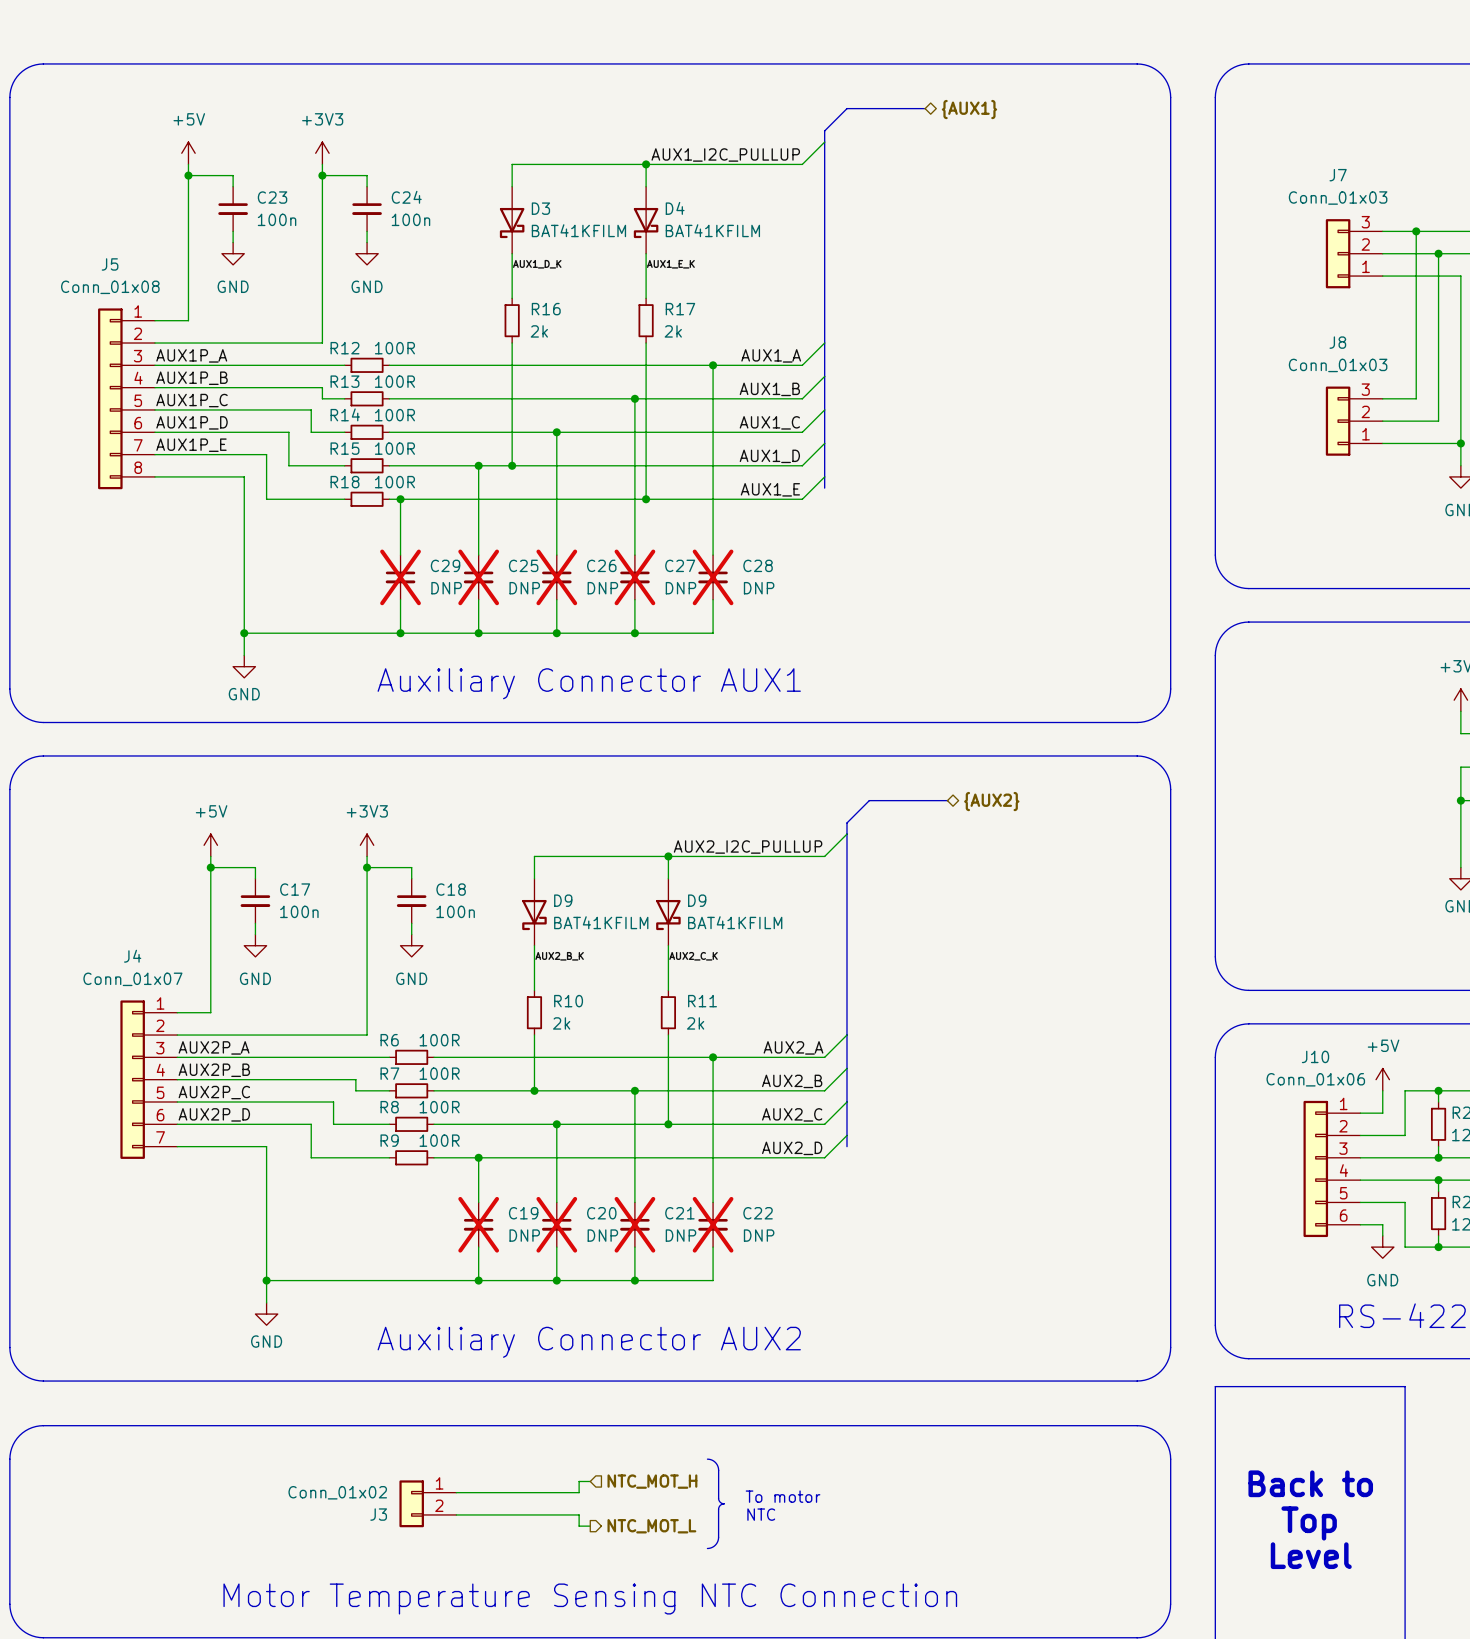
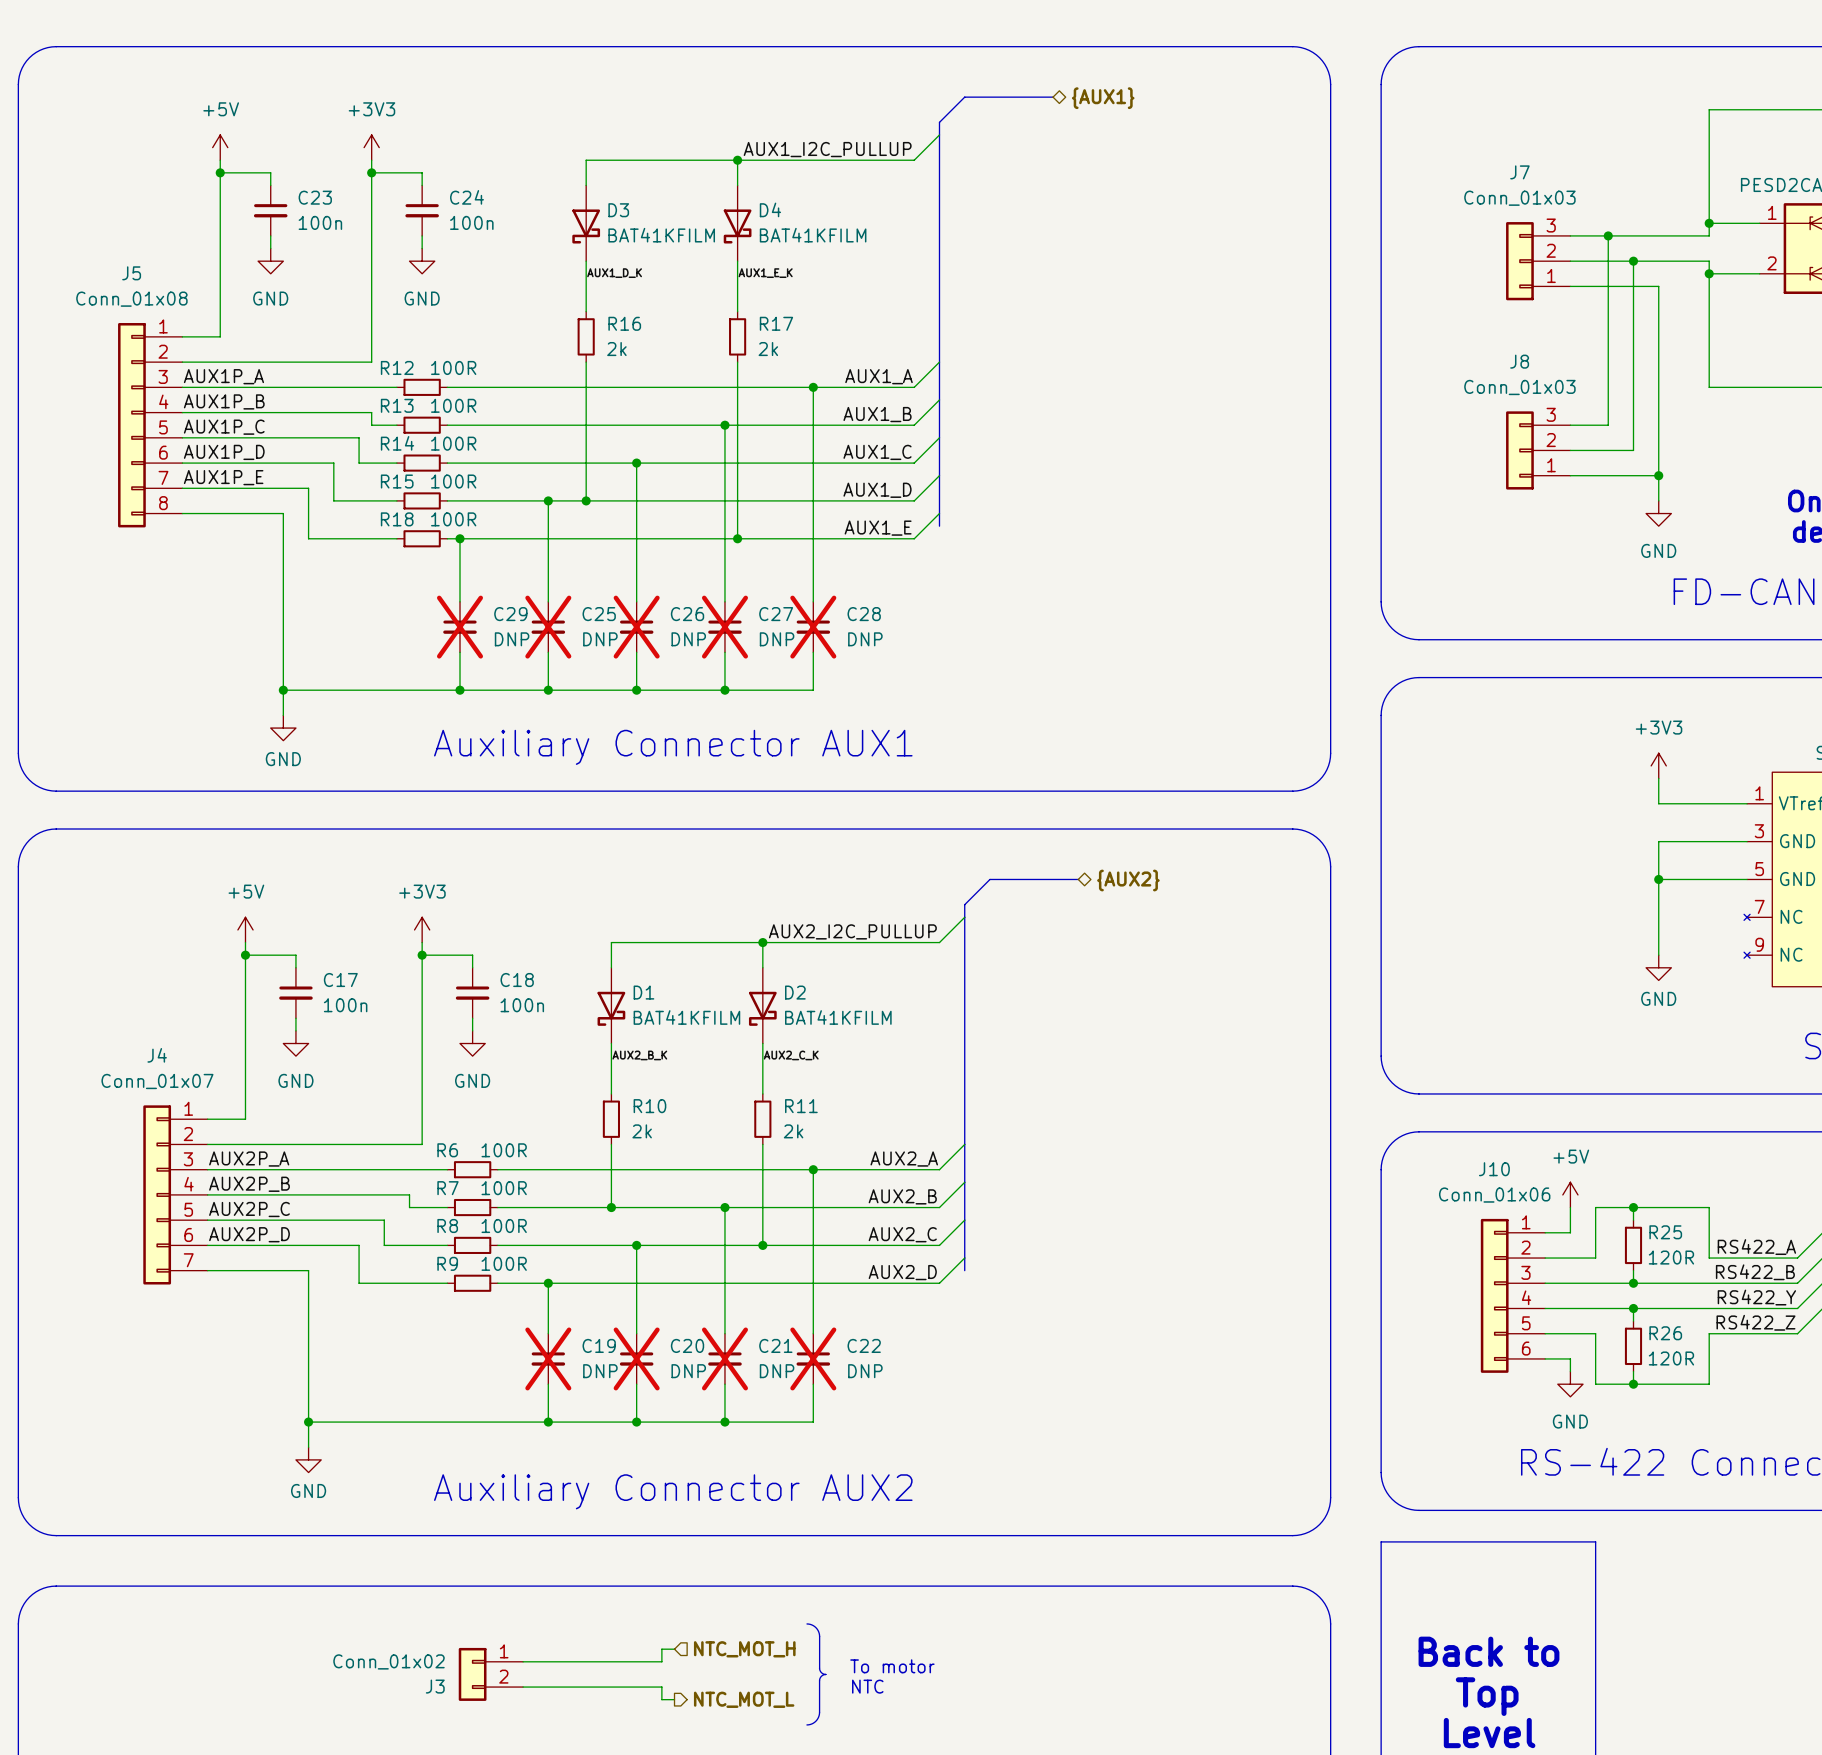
D9 name: D9 (563, 900) -> D1 (643, 992)
D9 name: D9 (697, 900) -> D2 (795, 992)

